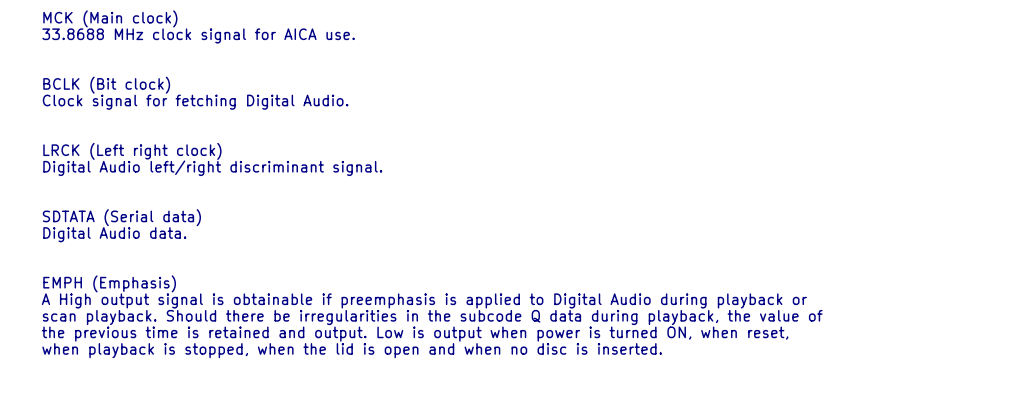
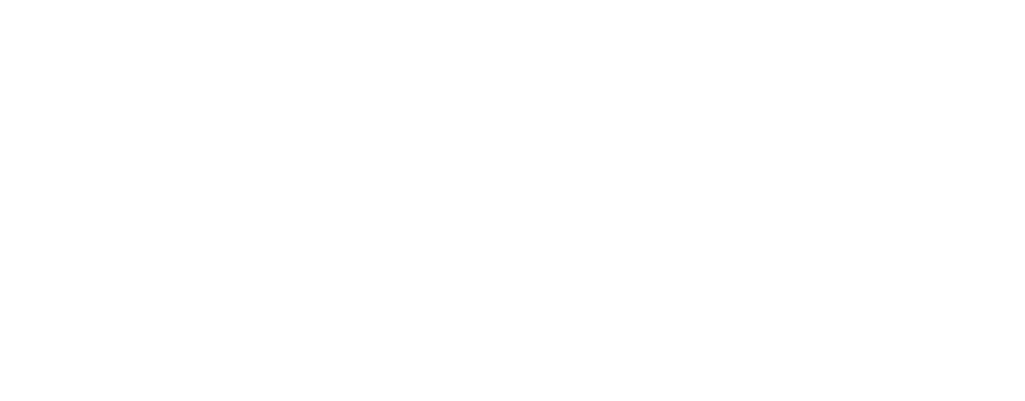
text: MCK (Main clock) (110, 18) -> none
text: 33.8688 MHz clock signal for AICA use. (198, 35) -> none
text: BCLK (Bit clock) (106, 85) -> none
text: Clock signal for fetching Digital Audio. (195, 102) -> none
text: LRCK (Left right clock) (132, 151) -> none
text: Digital Audio left/right discriminant signal. (212, 168) -> none
text: SDTATA (Serial data) (121, 217) -> none
text: Digital Audio data. (114, 234) -> none
text: EMPH (Emphasis) (109, 283) -> none
text: A High output signal is obtainable if preemphasis is applied to Digital Audio during playback or (424, 300) -> none
text: scan playback. Should there be irregularities in the subcode Q data during playback, the value of (432, 317) -> none
text: the previous time is retained and output. Low is output when power is turned ON, when reset, (415, 334) -> none
text: when playback is stopped, when the lid is open and when no disc is inserted. (352, 350) -> none

